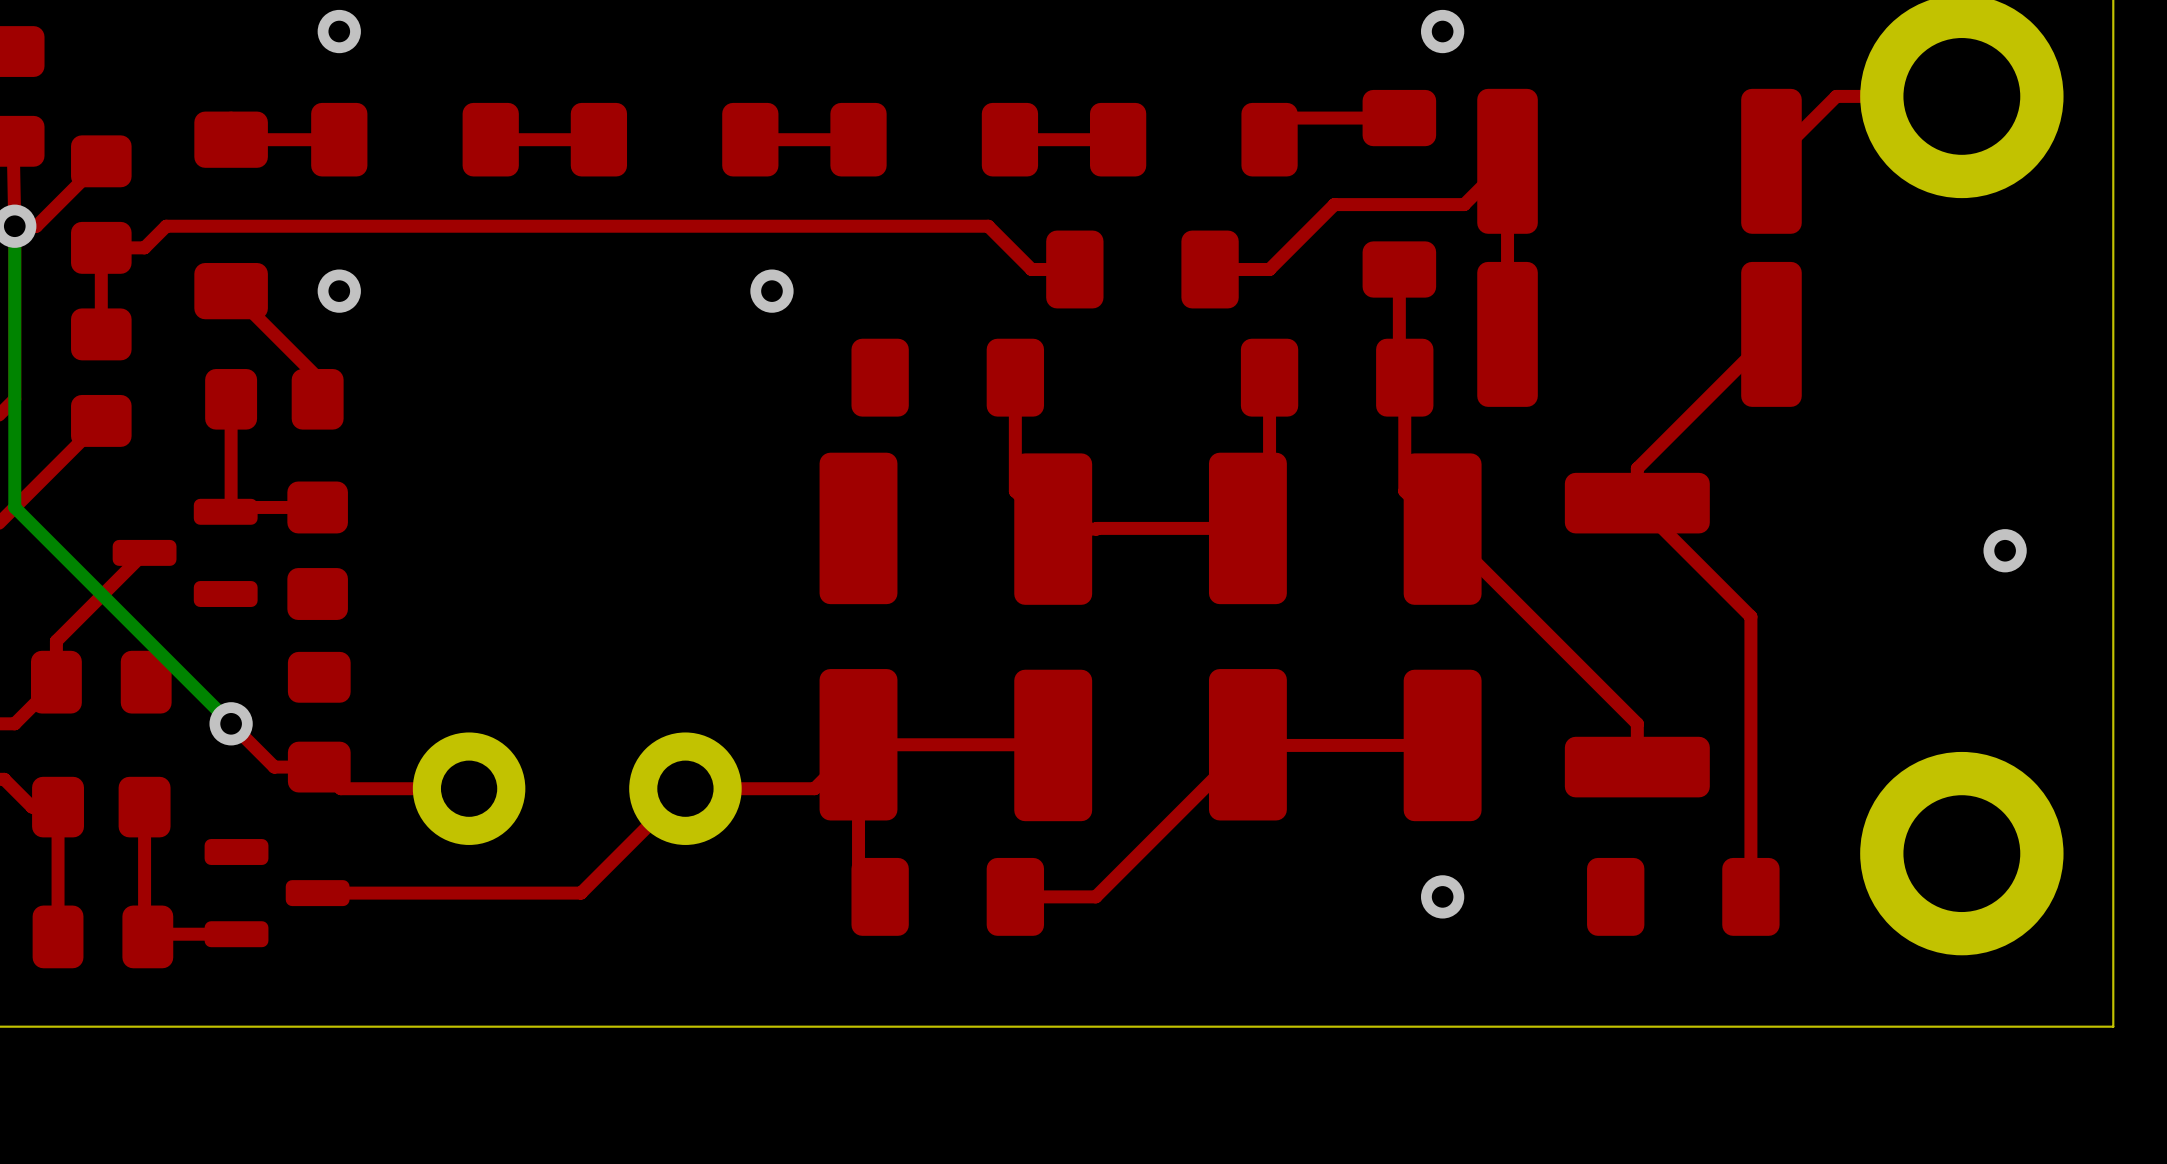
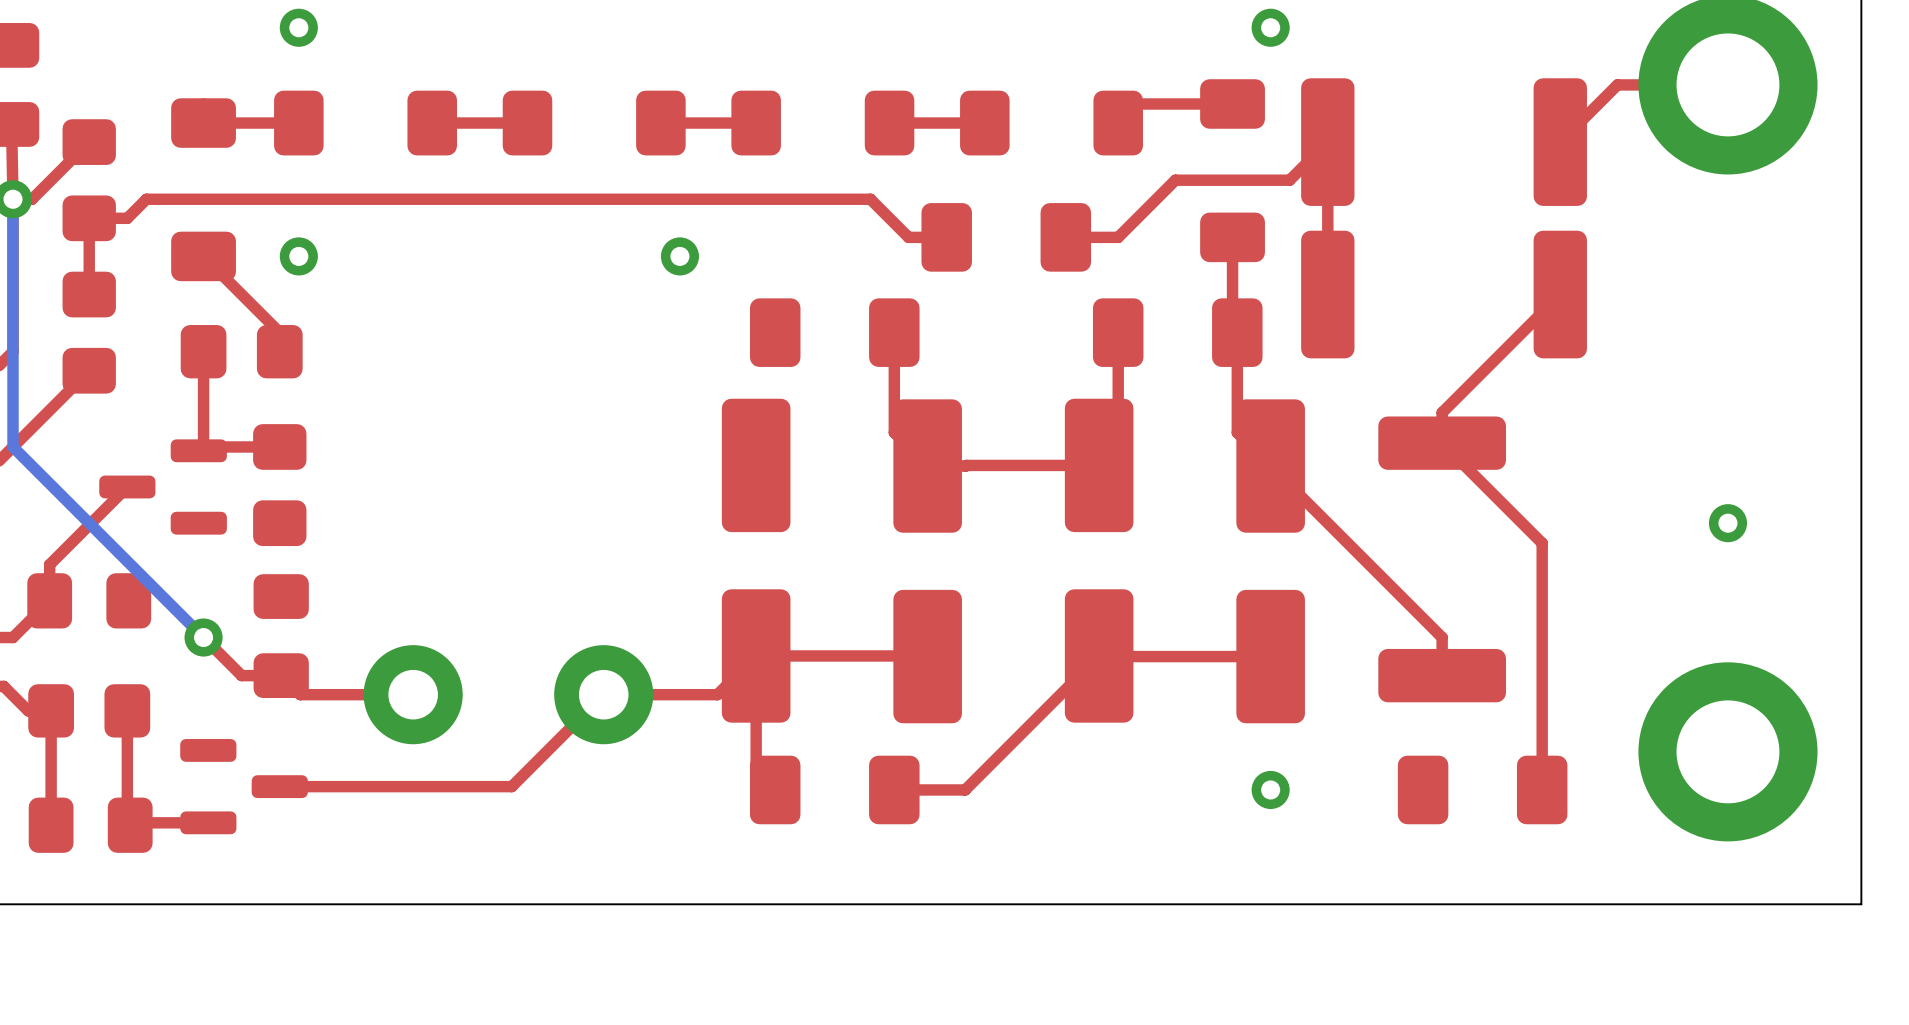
via position: (2005, 550) -> (1727, 523)

